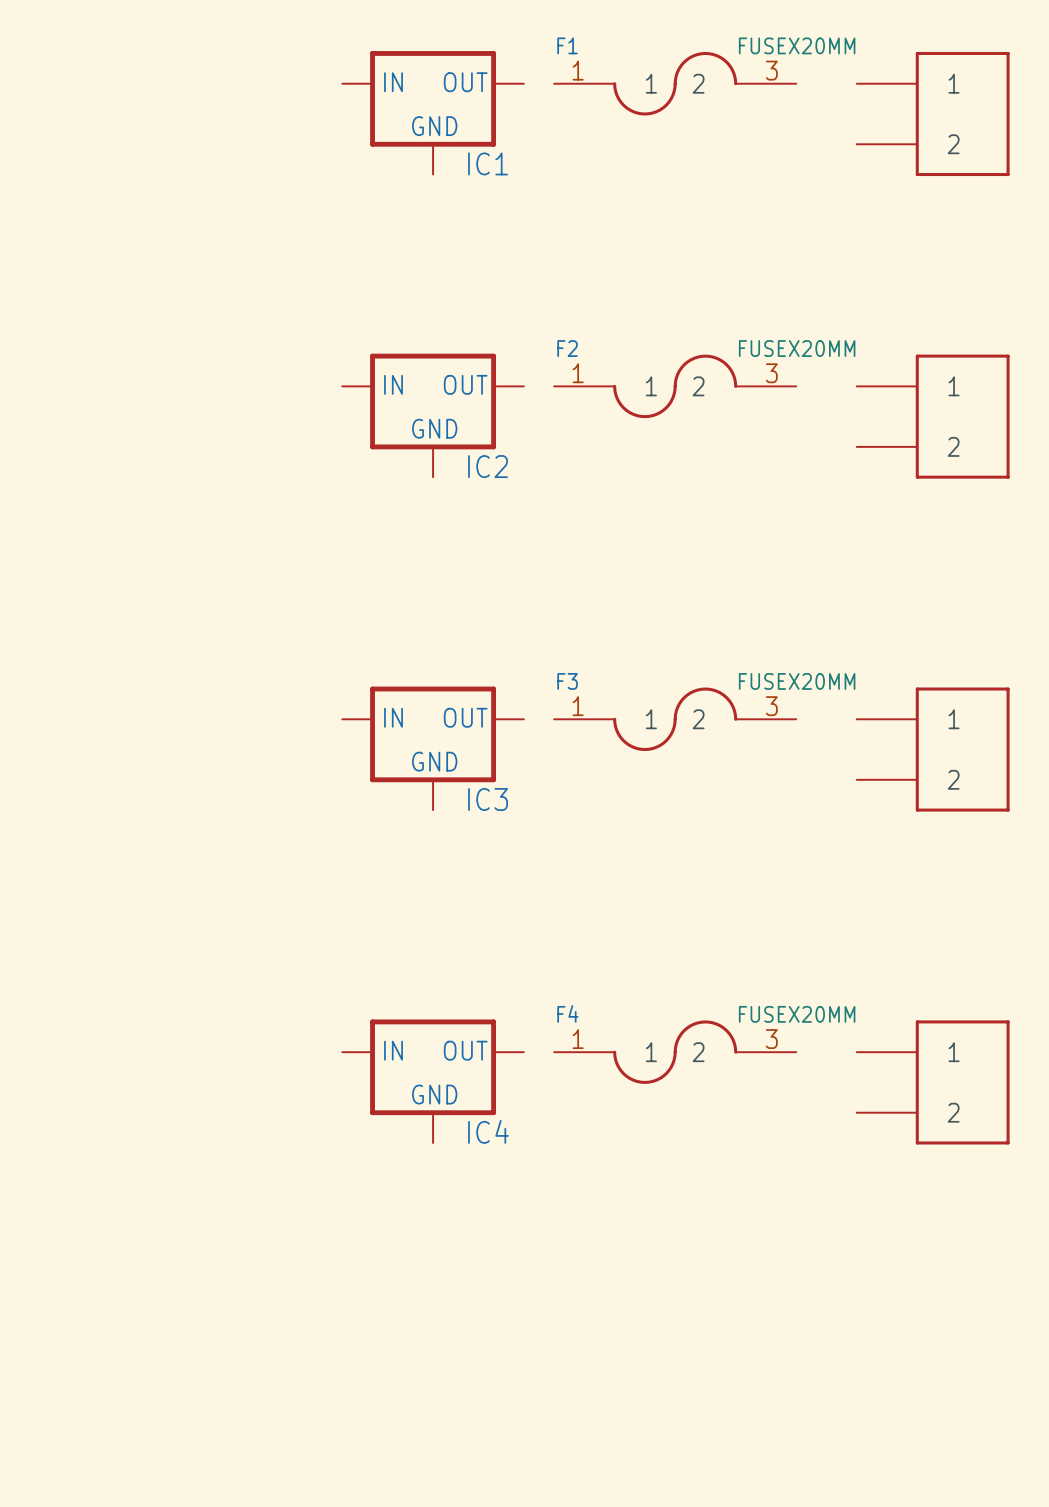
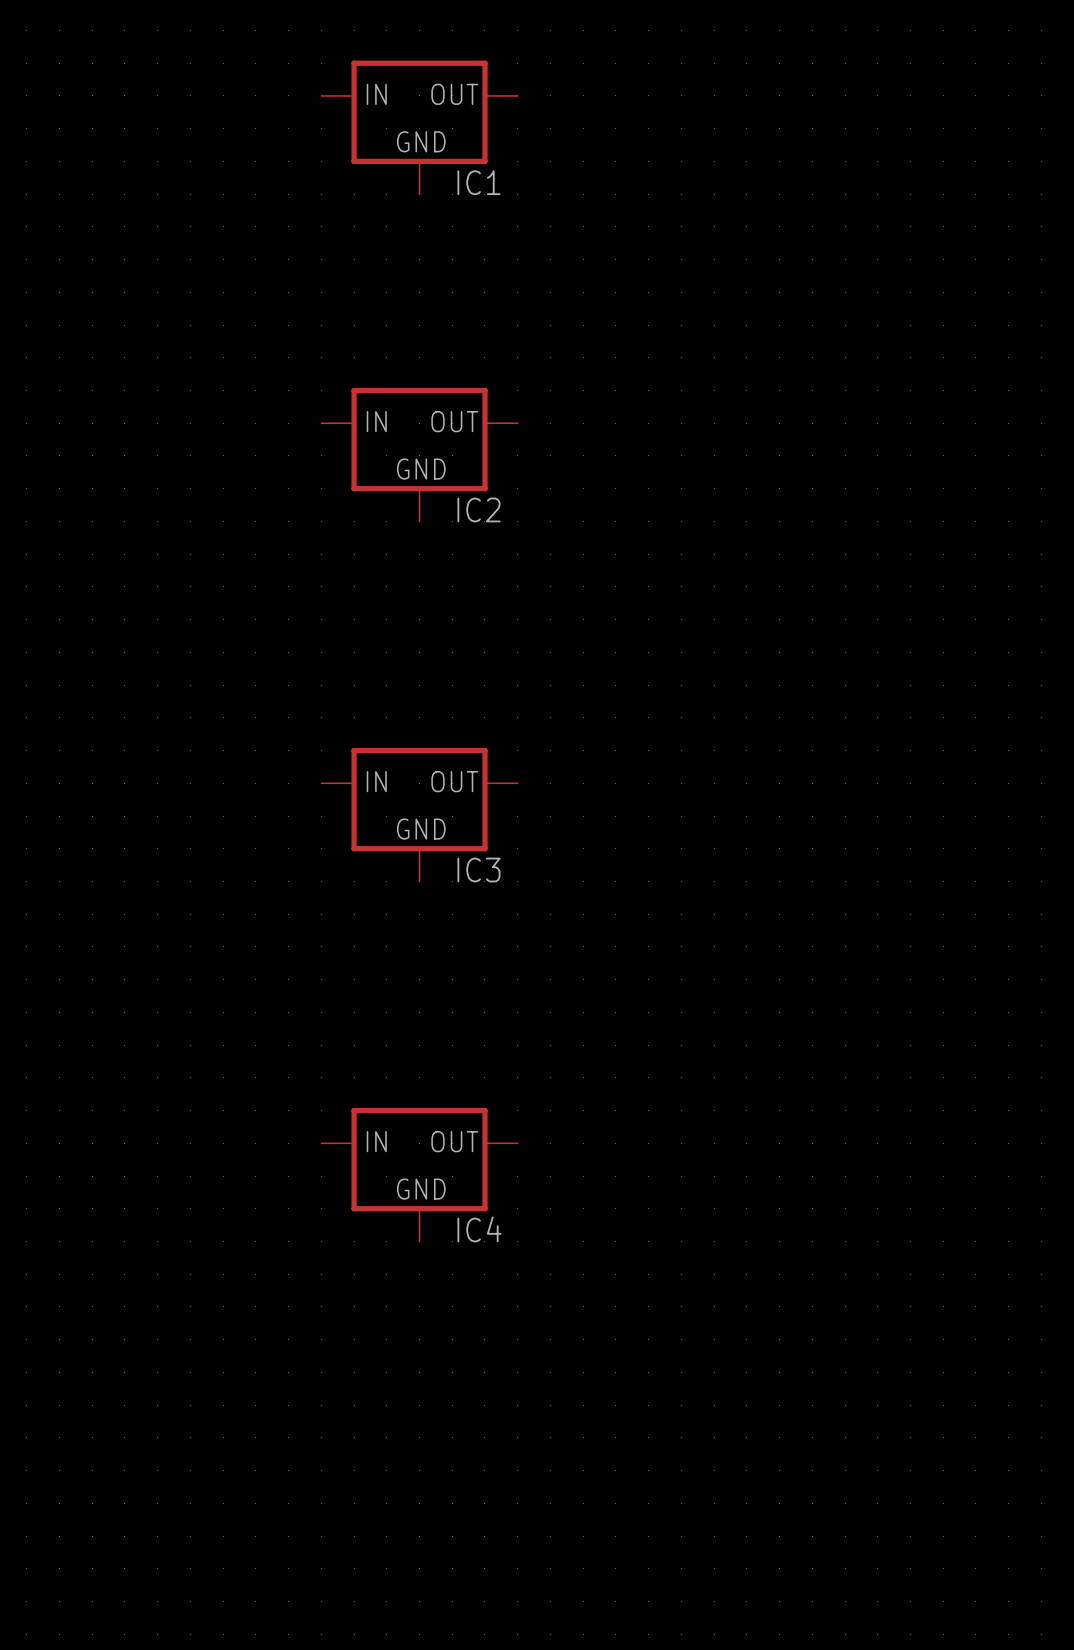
F1: FUSEX20MM (675, 83) -> none
part: (933, 113) -> none
F2: FUSEX20MM (675, 386) -> none
part: (933, 416) -> none
F3: FUSEX20MM (675, 719) -> none
part: (933, 749) -> none
F4: FUSEX20MM (675, 1052) -> none
part: (933, 1082) -> none

